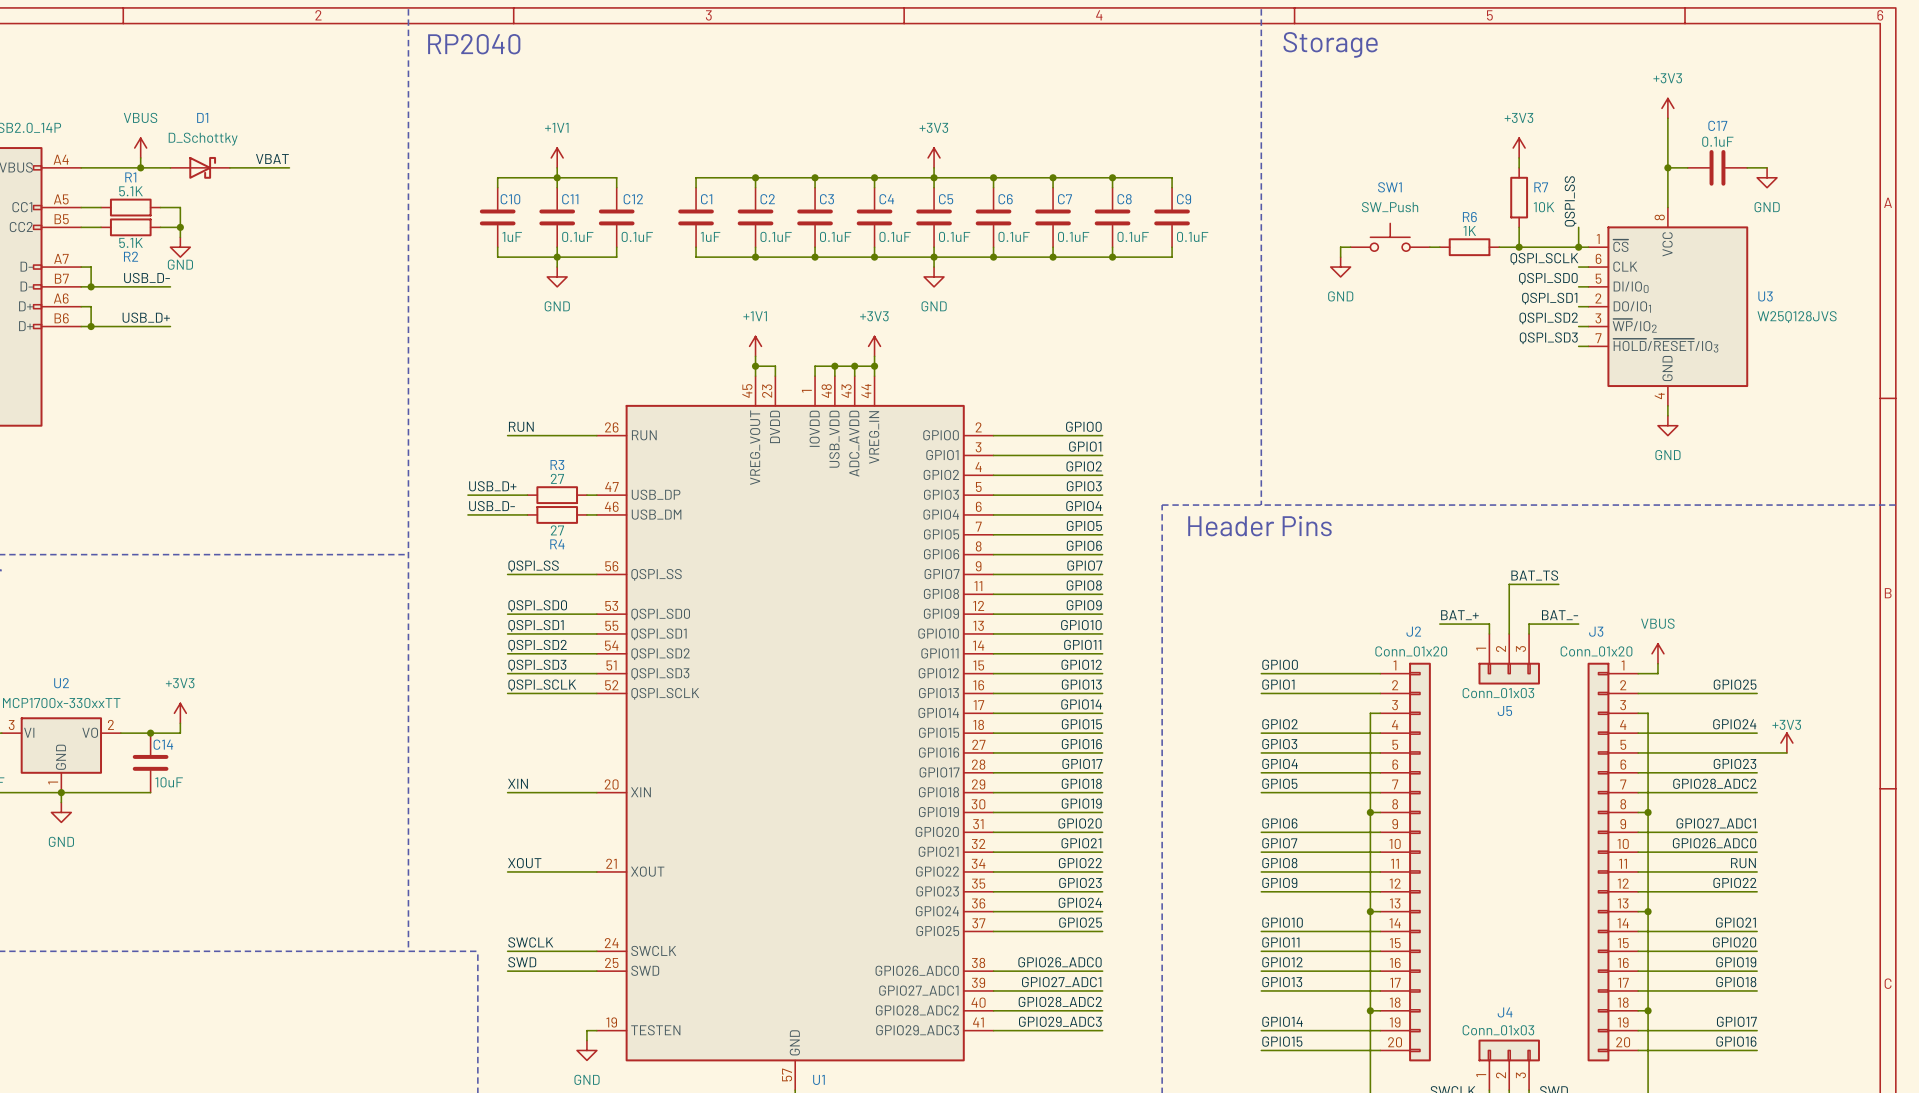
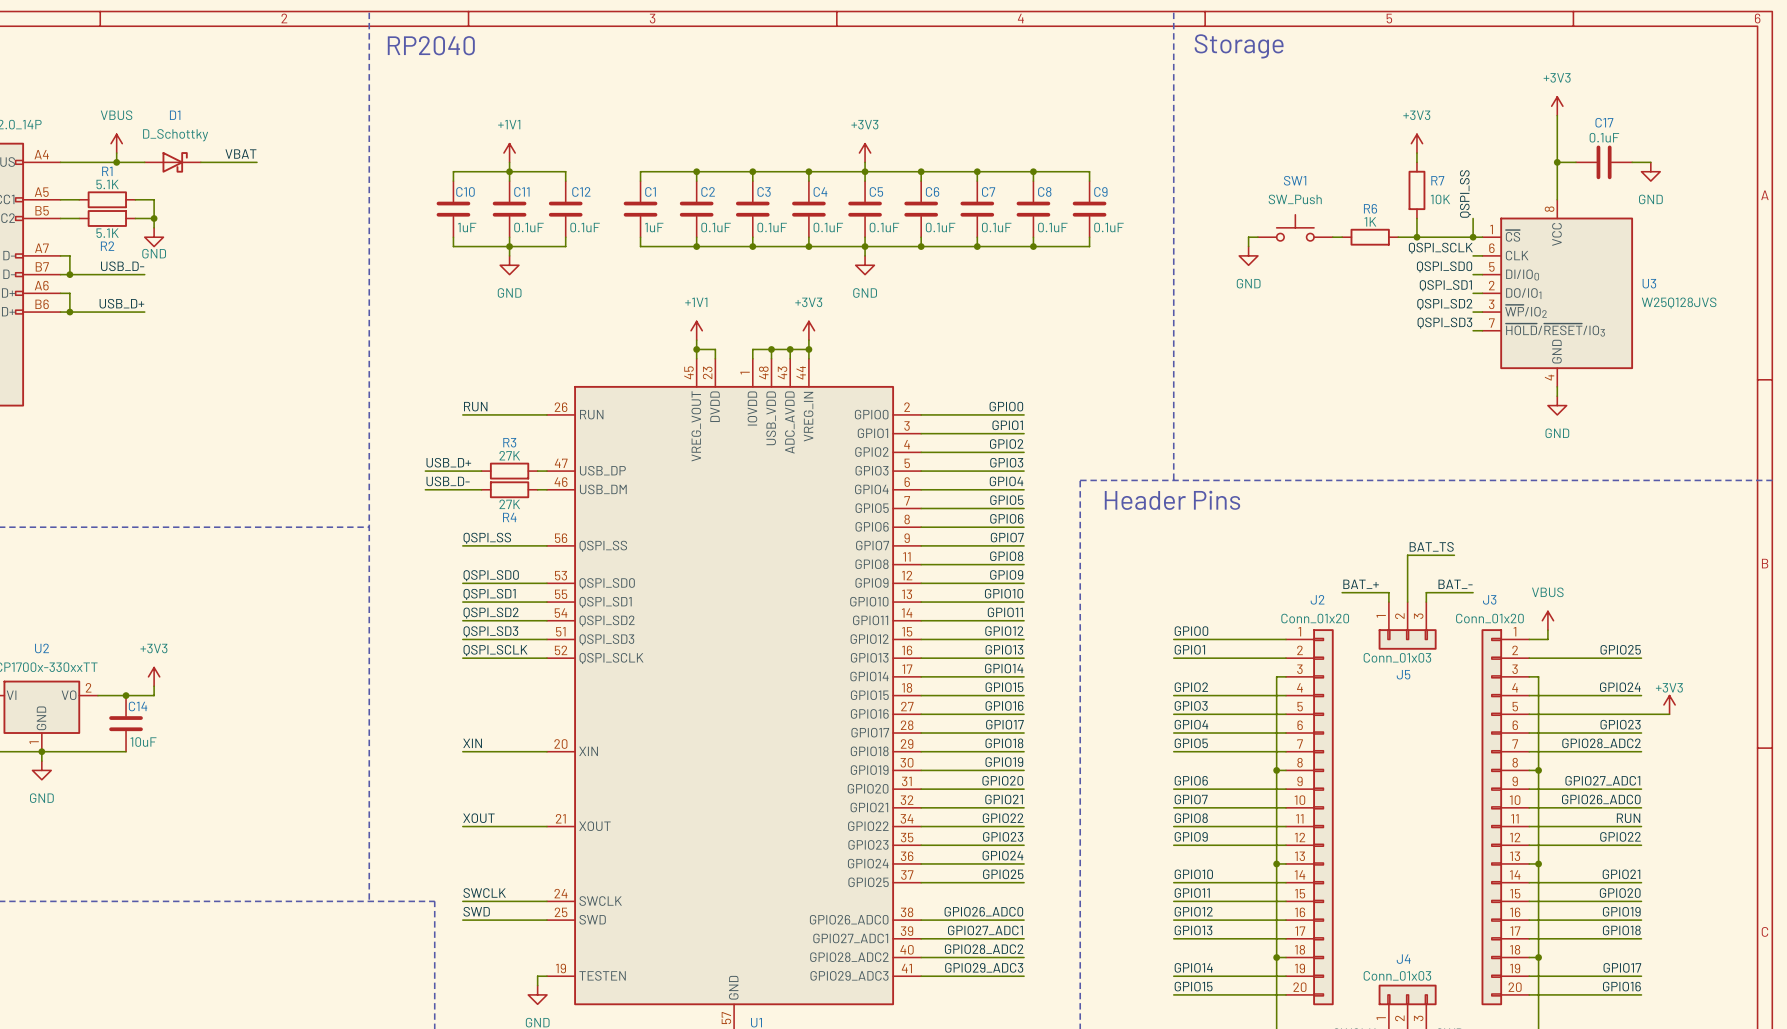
R3 value: 27 (557, 478) -> 27K (509, 455)
R4 value: 27 (557, 530) -> 27K (509, 504)

